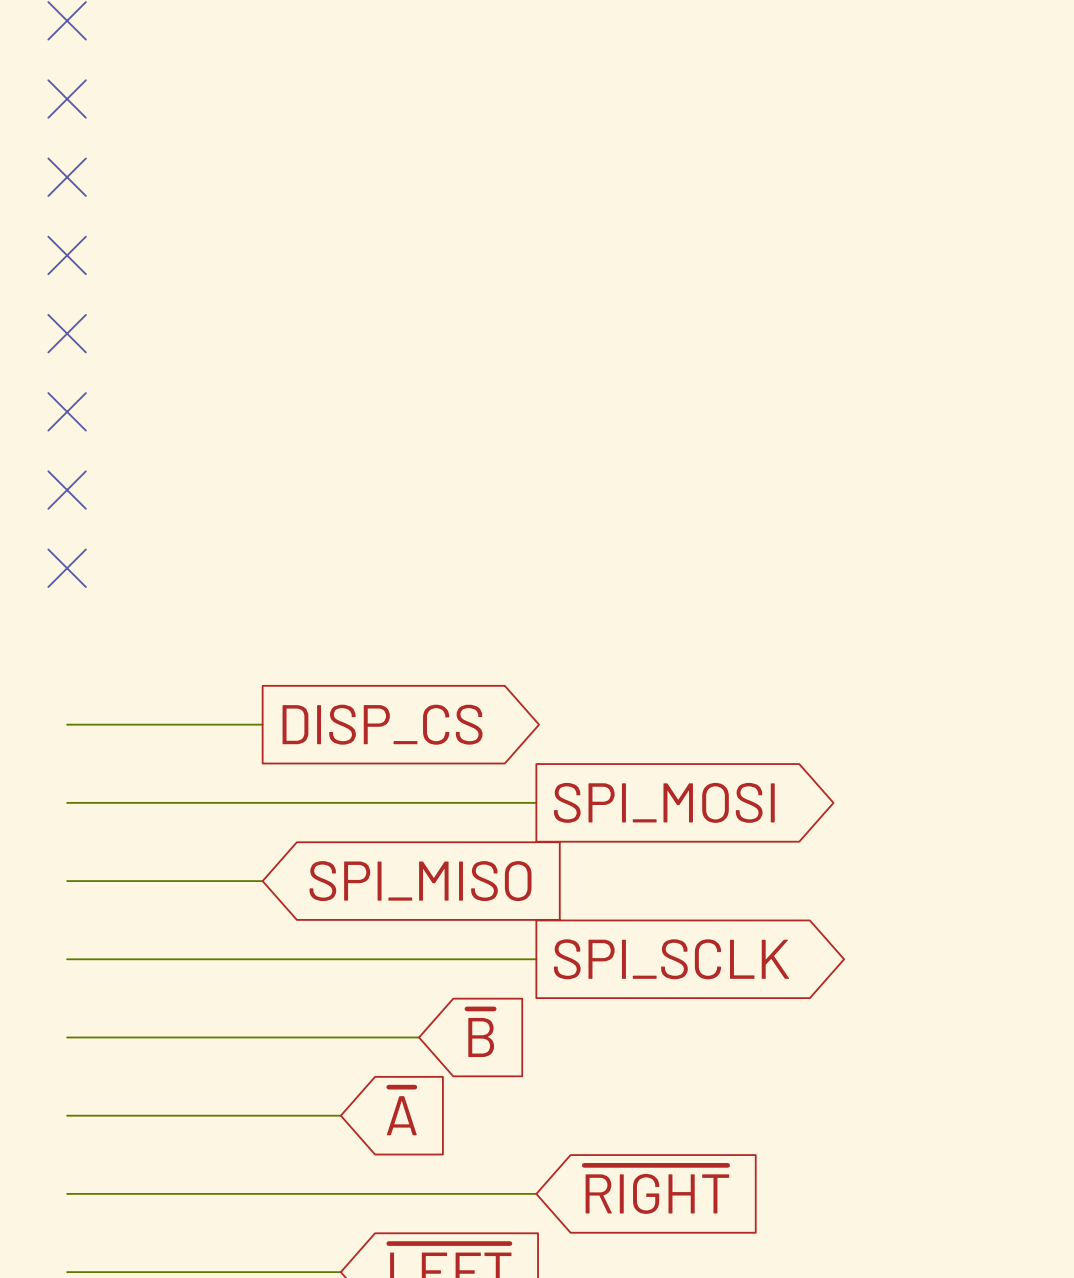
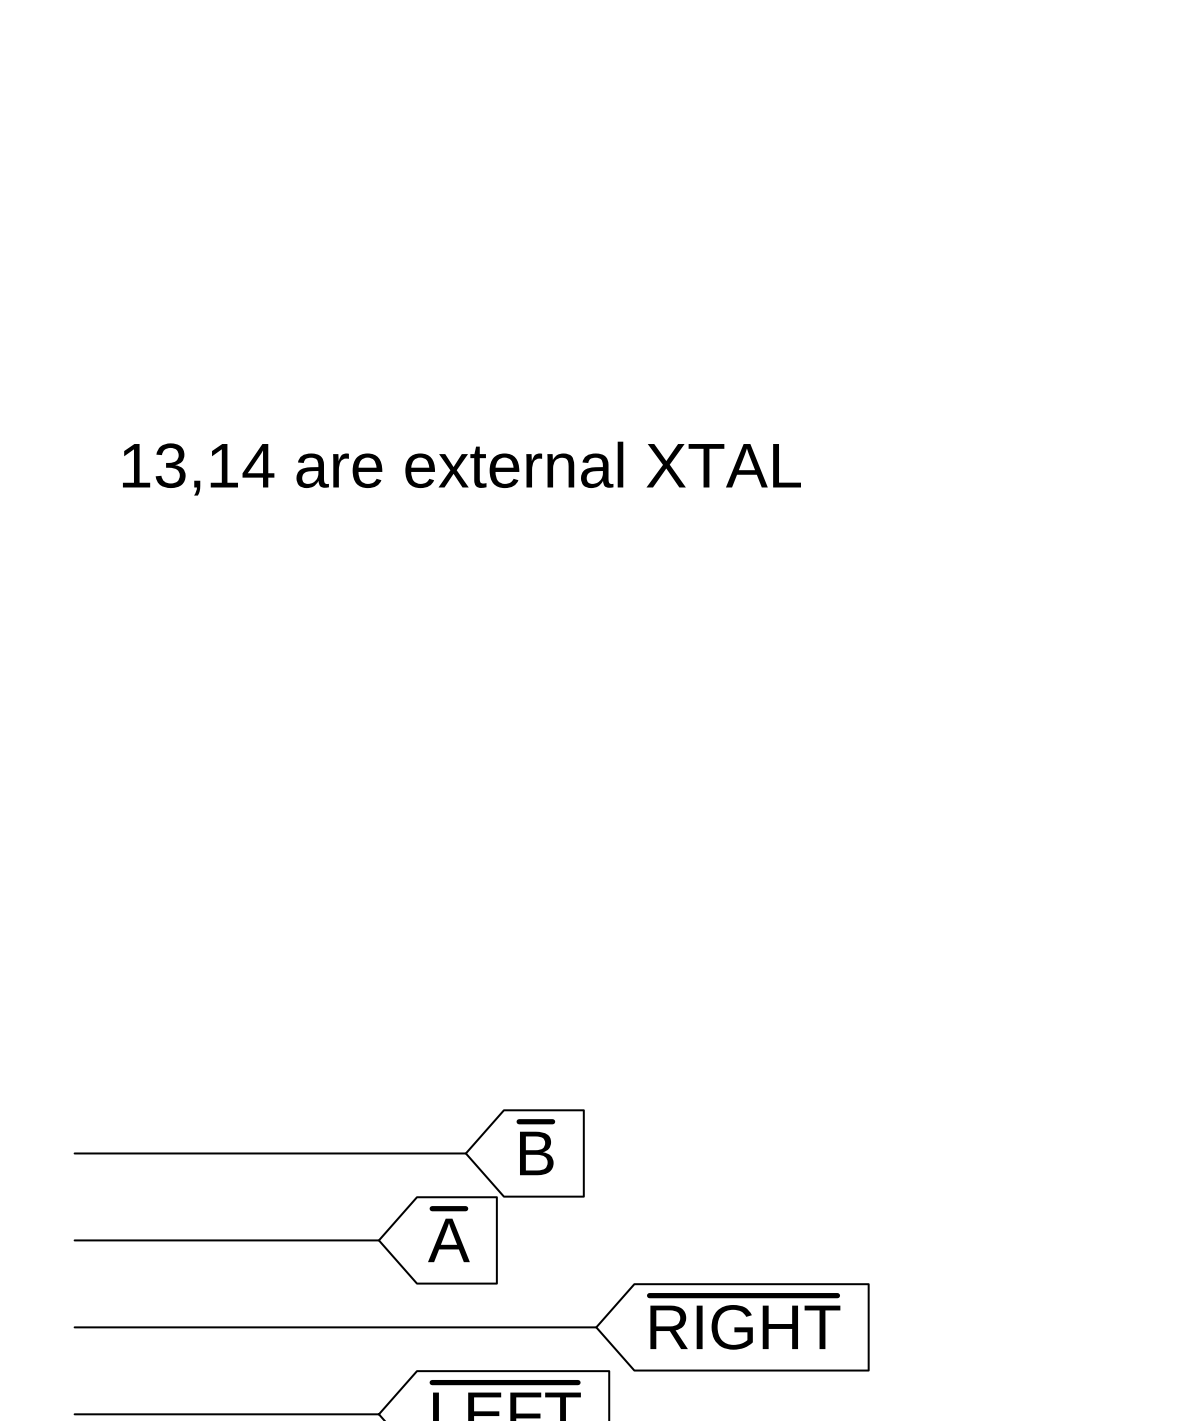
no-connect mark: (67, 20) -> none
no-connect mark: (67, 99) -> none
no-connect mark: (67, 177) -> none
no-connect mark: (67, 255) -> none
no-connect mark: (67, 333) -> none
no-connect mark: (67, 411) -> none
text: none -> 13,14 are external XTAL (461, 468)
no-connect mark: (67, 490) -> none
no-connect mark: (67, 568) -> none
wire: (67, 724) (262, 724) -> none
global label: DISP_CS (382, 724) -> none
wire: (67, 802) (536, 802) -> none
global label: SPI_MOSI (664, 802) -> none
wire: (67, 881) (262, 881) -> none
global label: SPI_MISO (420, 881) -> none
wire: (67, 959) (536, 959) -> none
global label: SPI_SCLK (671, 959) -> none

